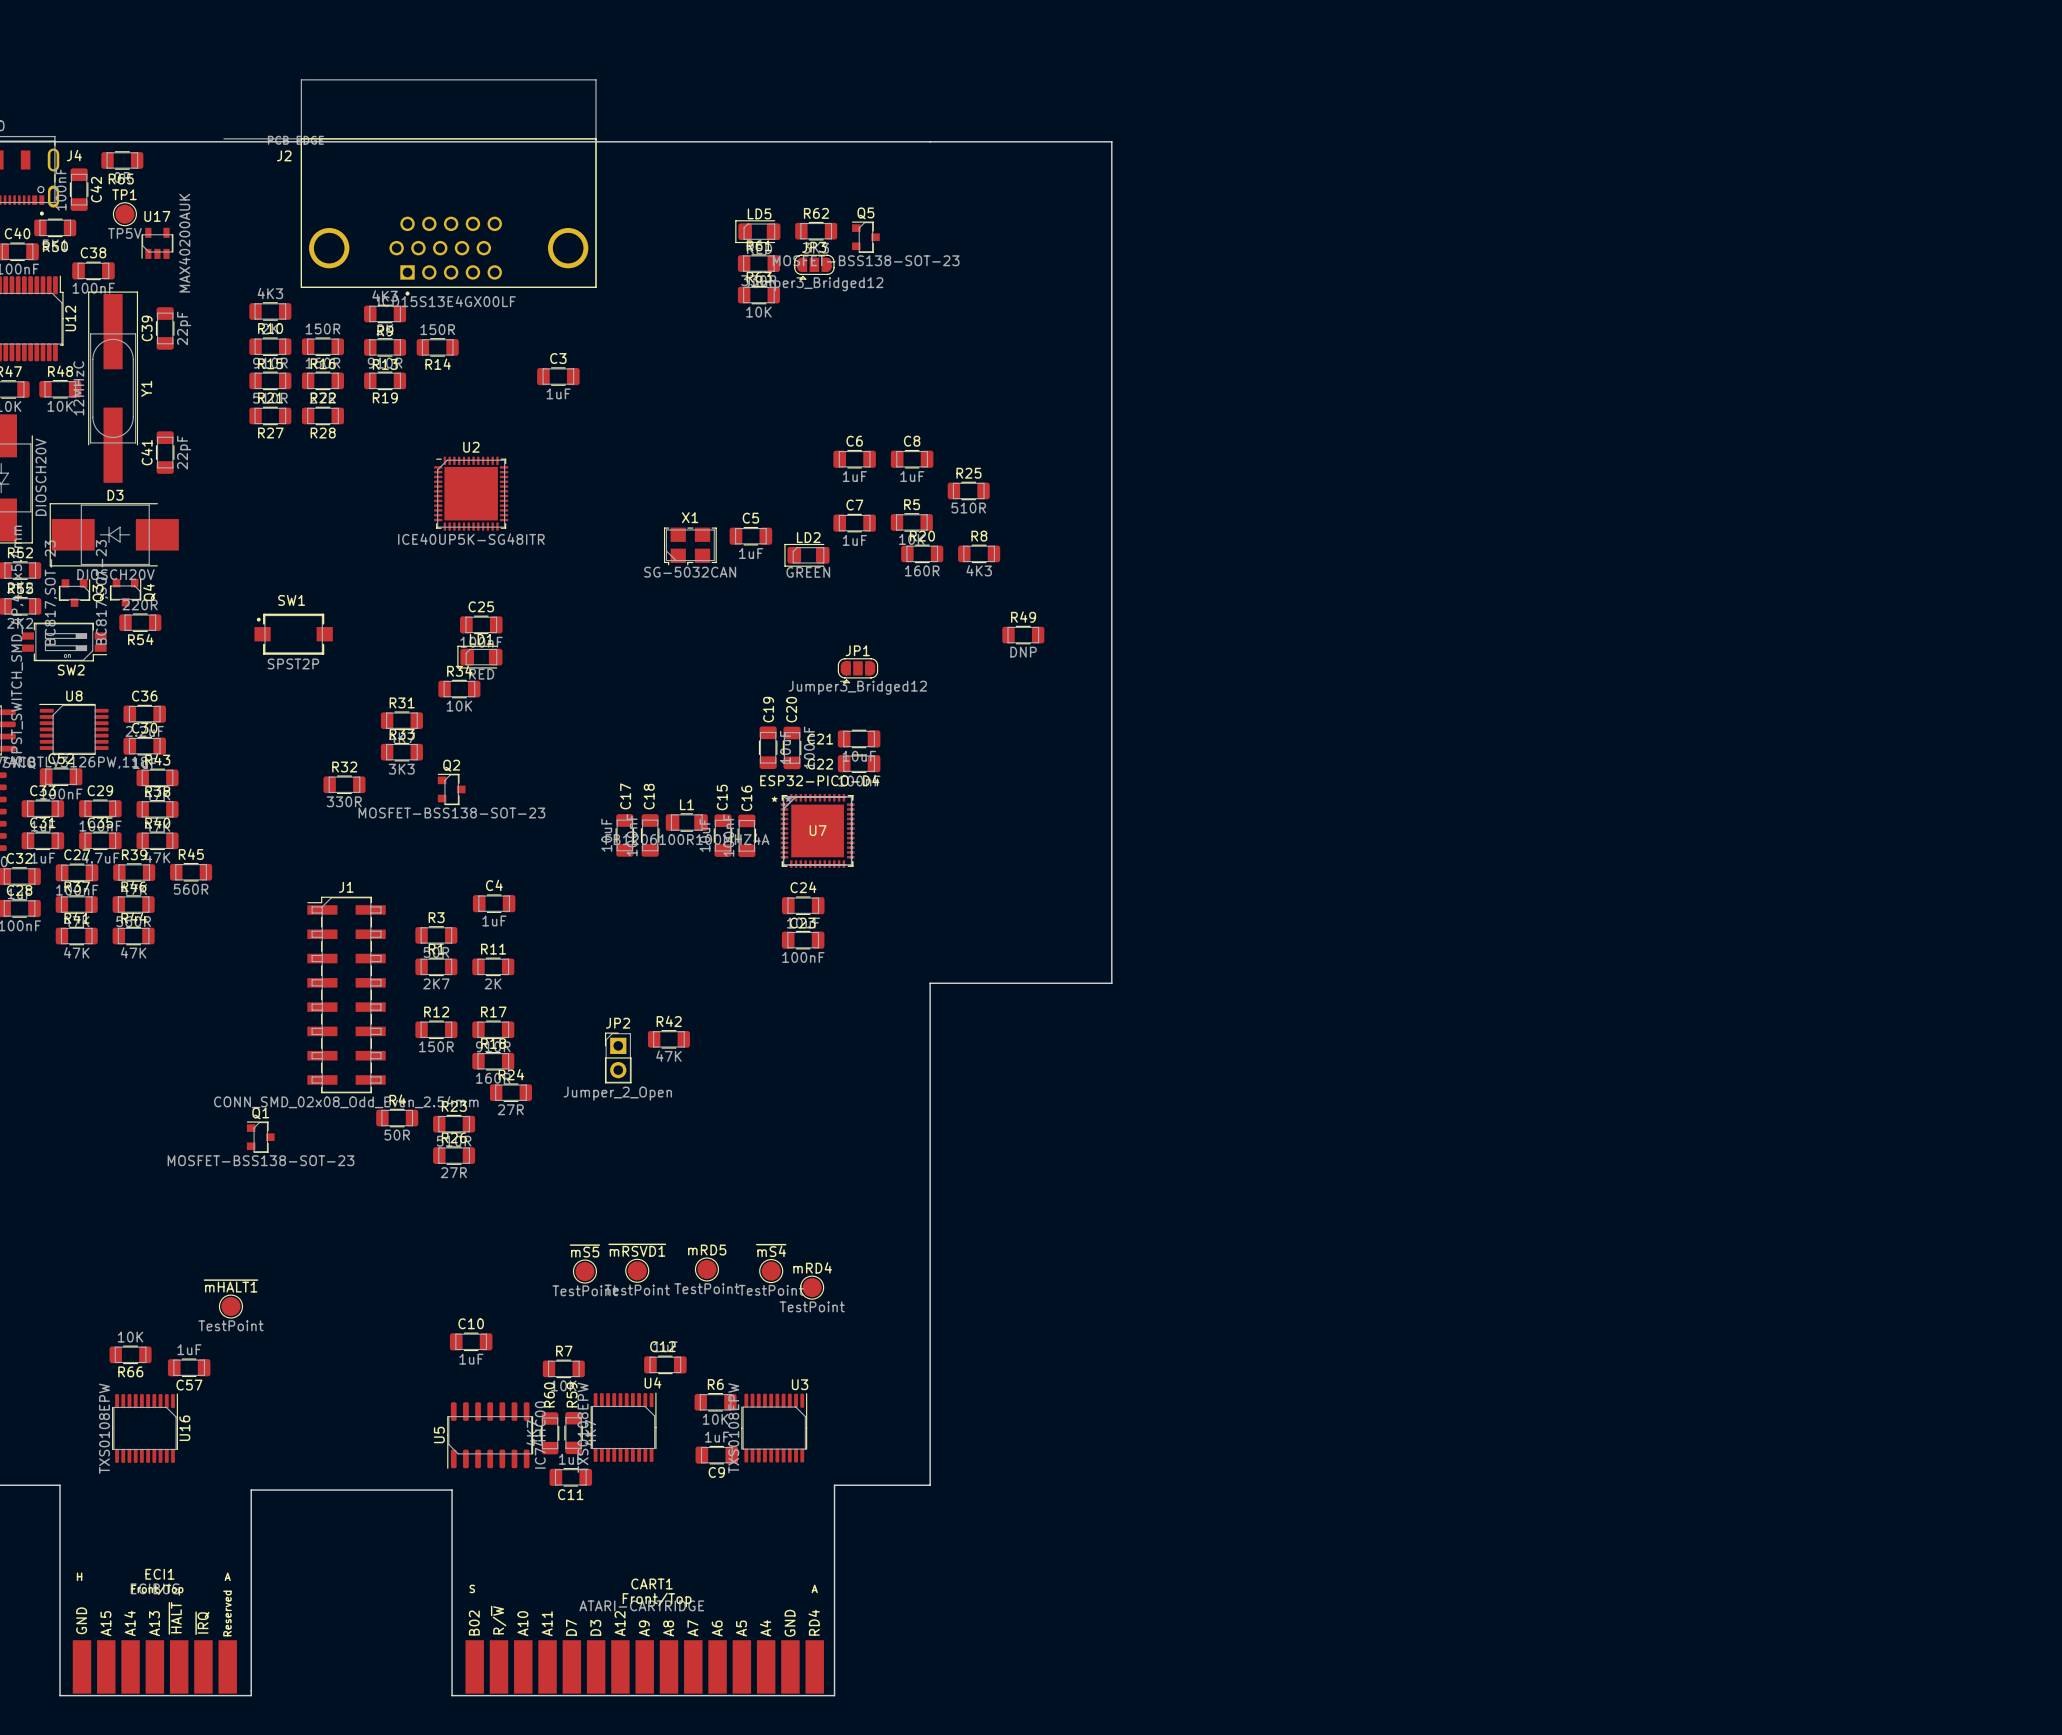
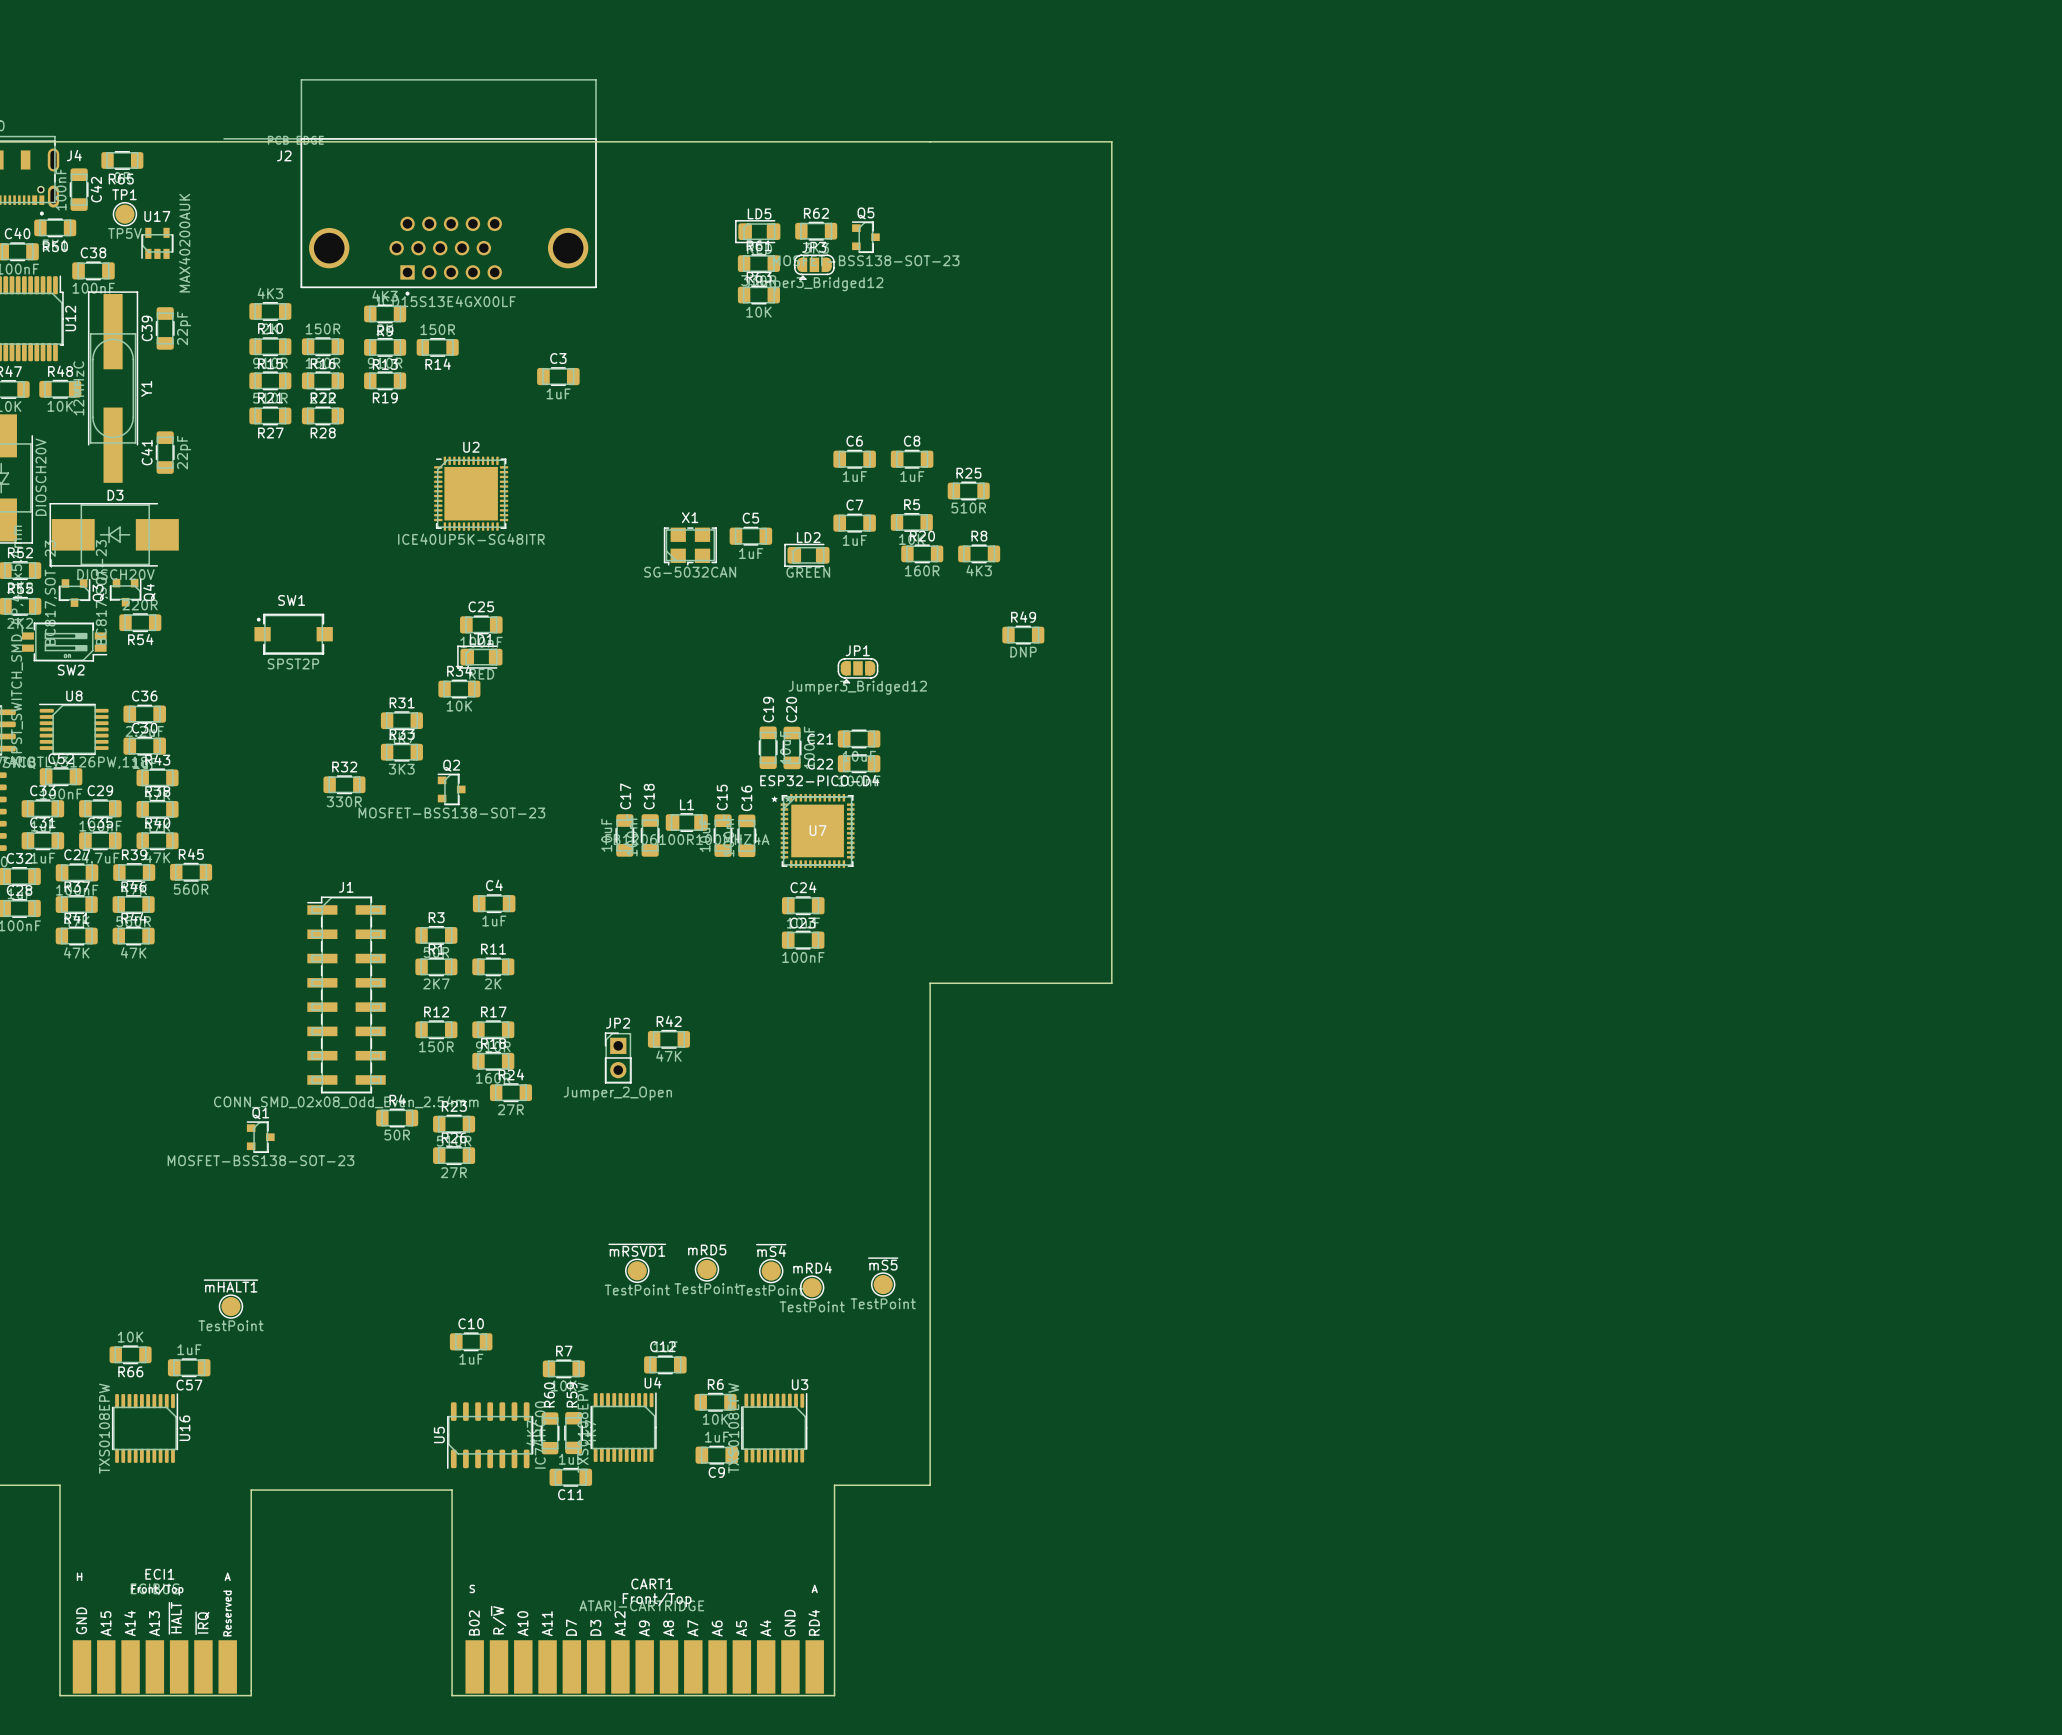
~{mS5} position: (584, 1271) -> (883, 1284)

